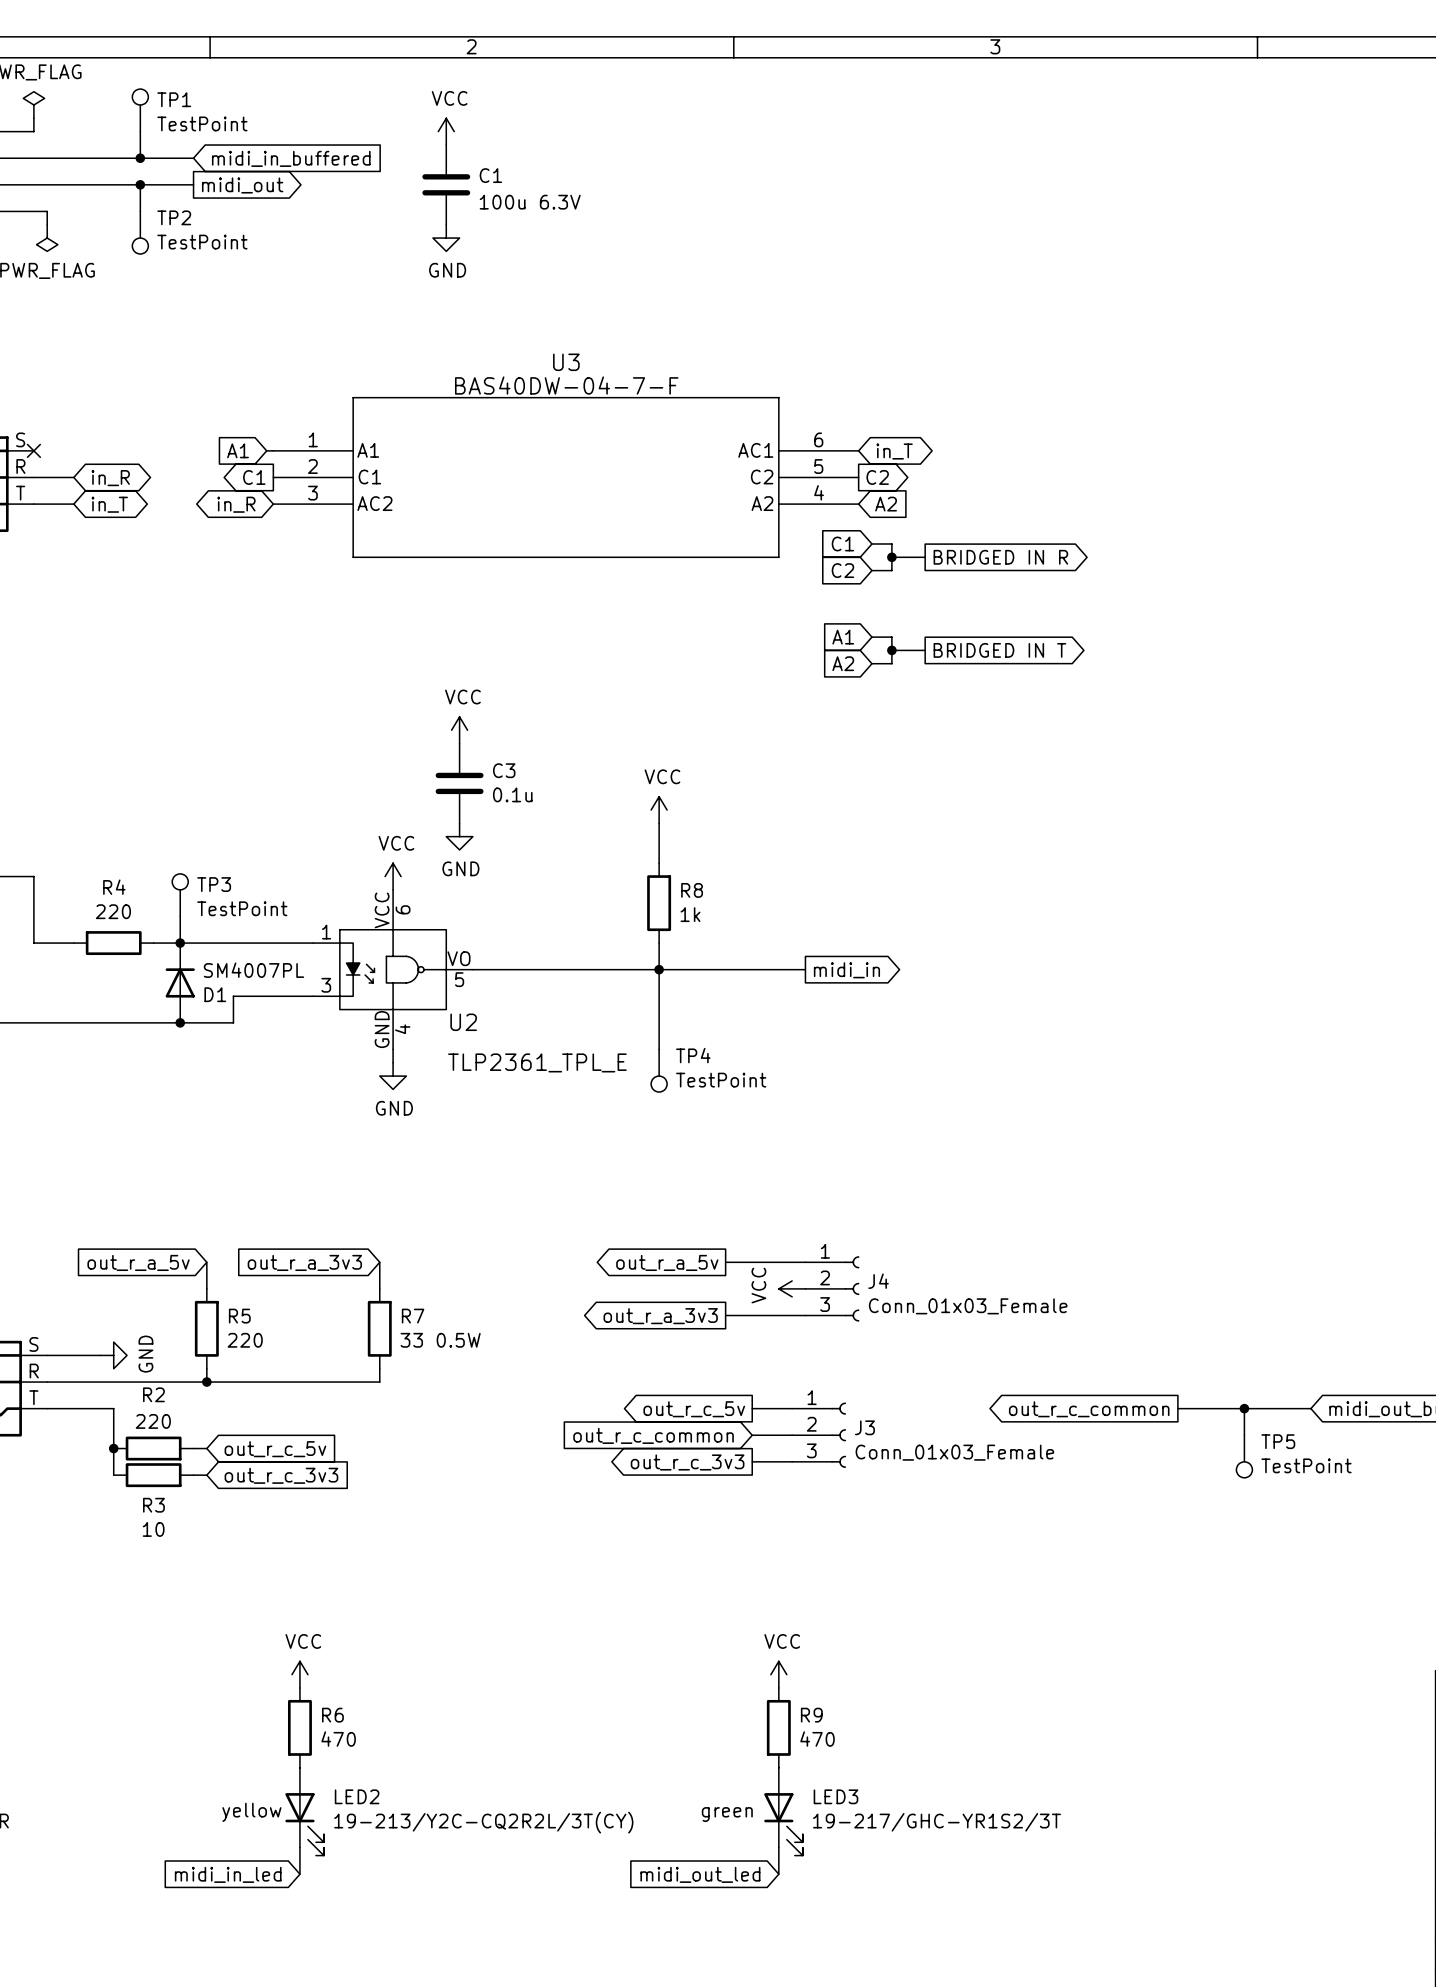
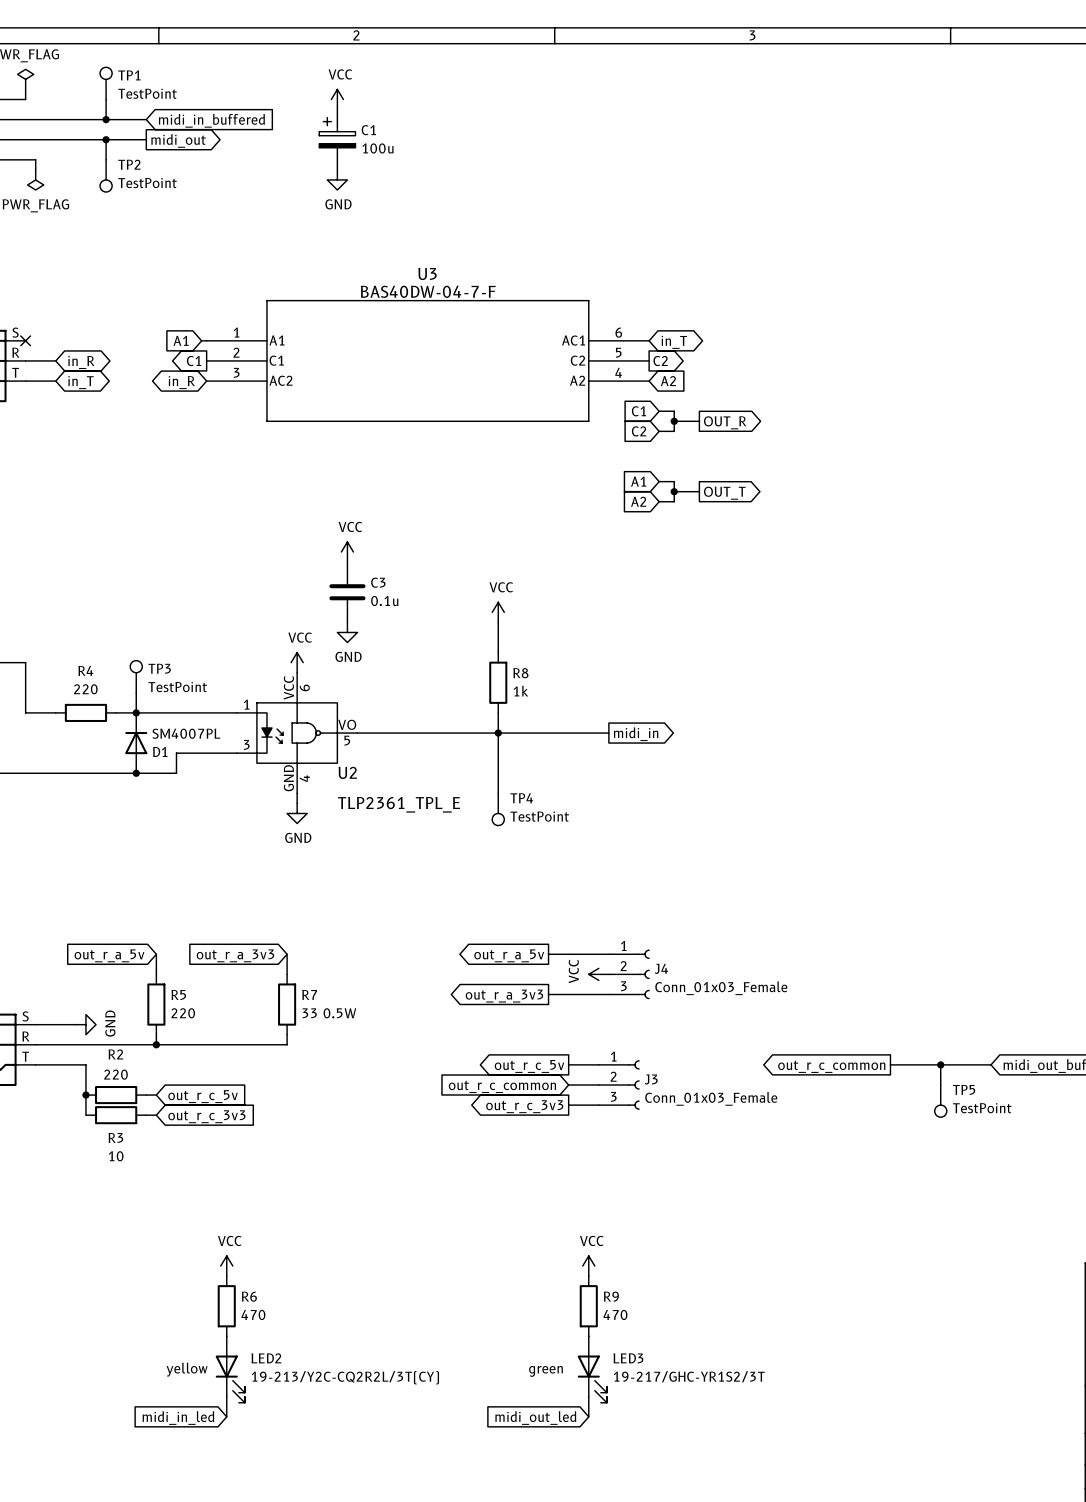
C1 symbol: [422, 144, 471, 225] -> [319, 109, 356, 170]
C1 value: 100u 6.3V (530, 202) -> 100u (377, 148)
global label: BRIDGED IN R (1000, 557) -> OUT_R (725, 422)
global label: BRIDGED IN T (999, 650) -> OUT_T (724, 493)

